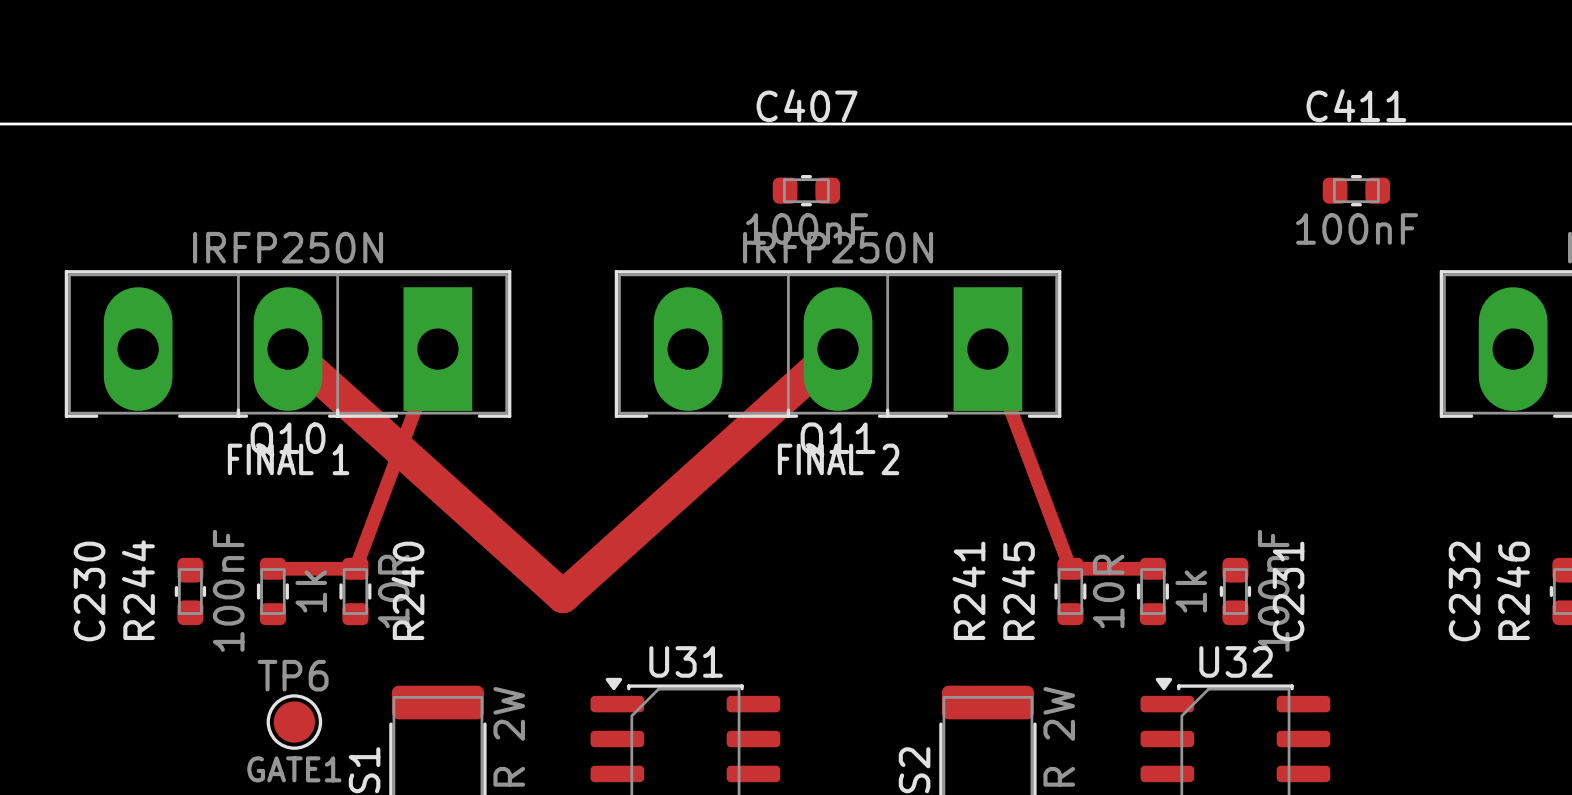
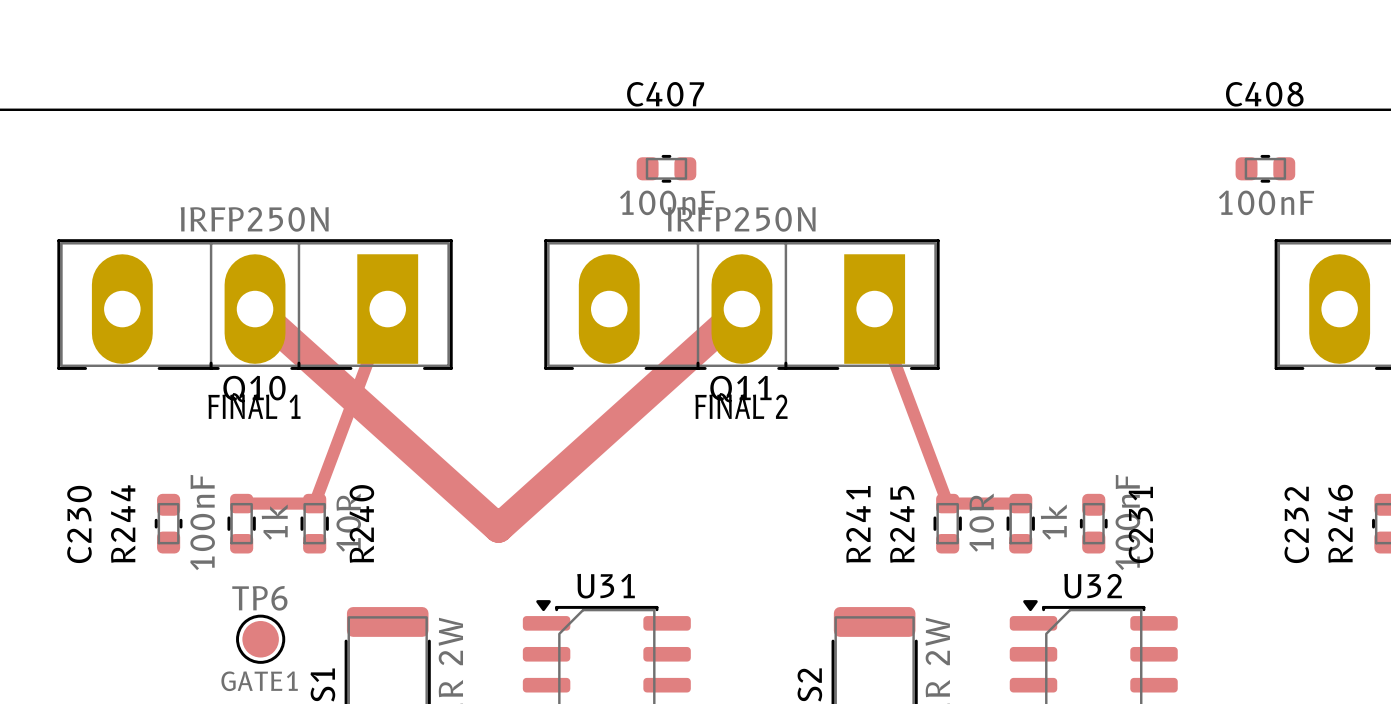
C407 position: (806, 190) -> (666, 168)
C411: 100nF (1356, 190) -> none
C408: none -> 100nF (1265, 168)

